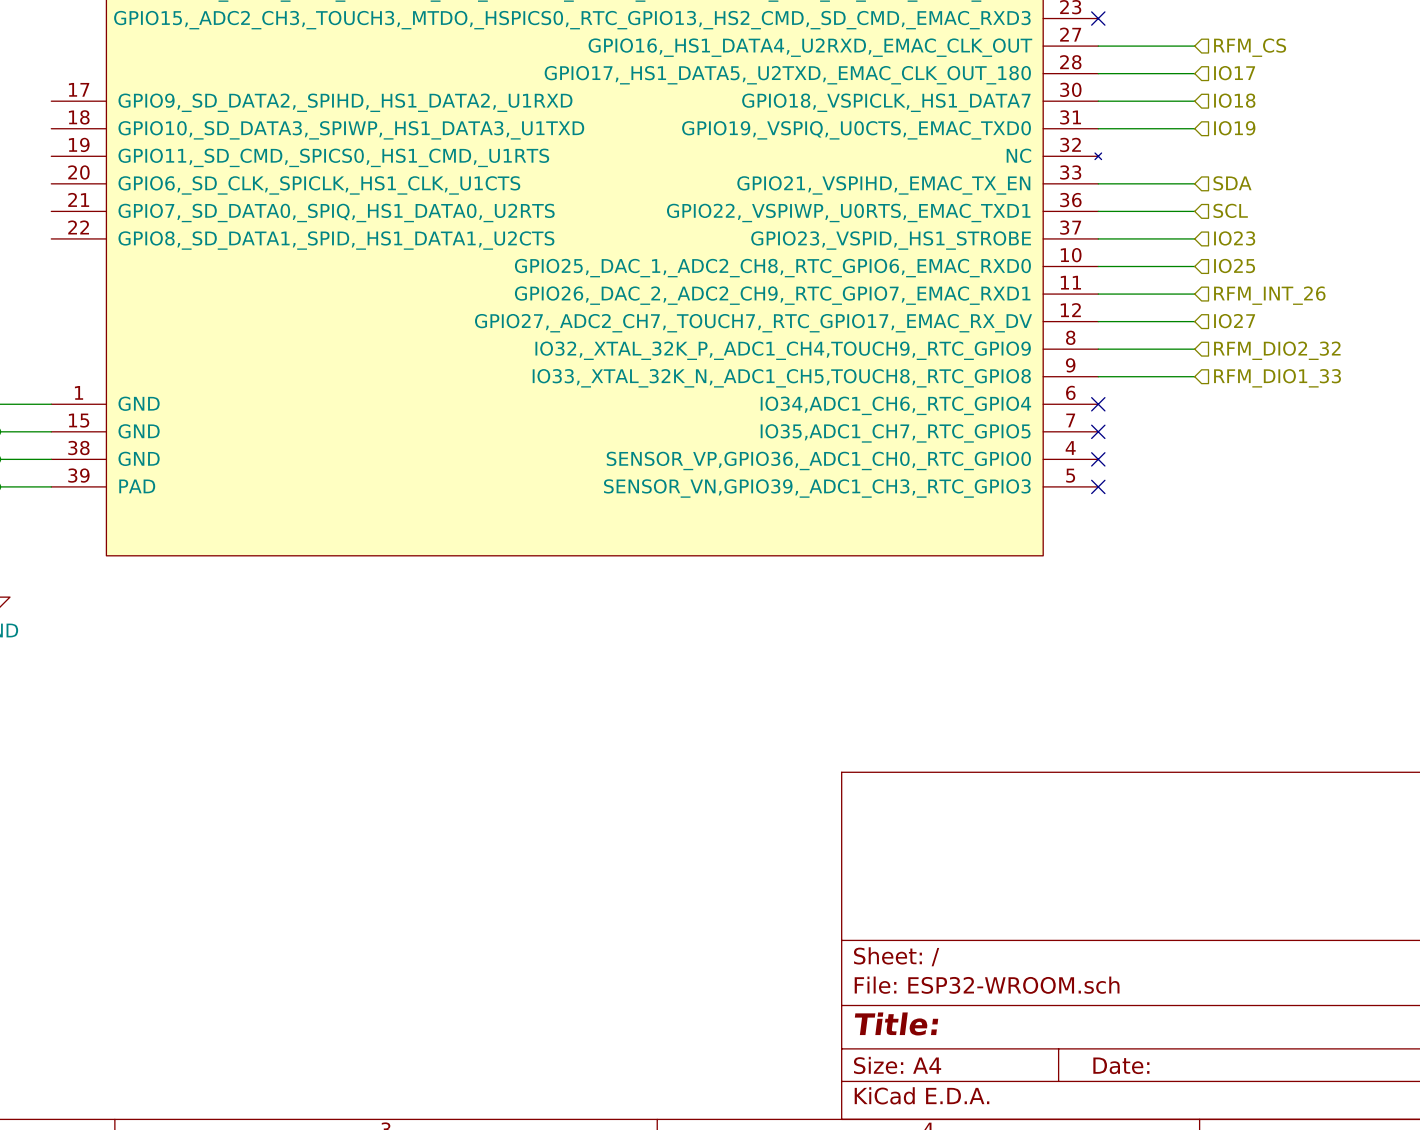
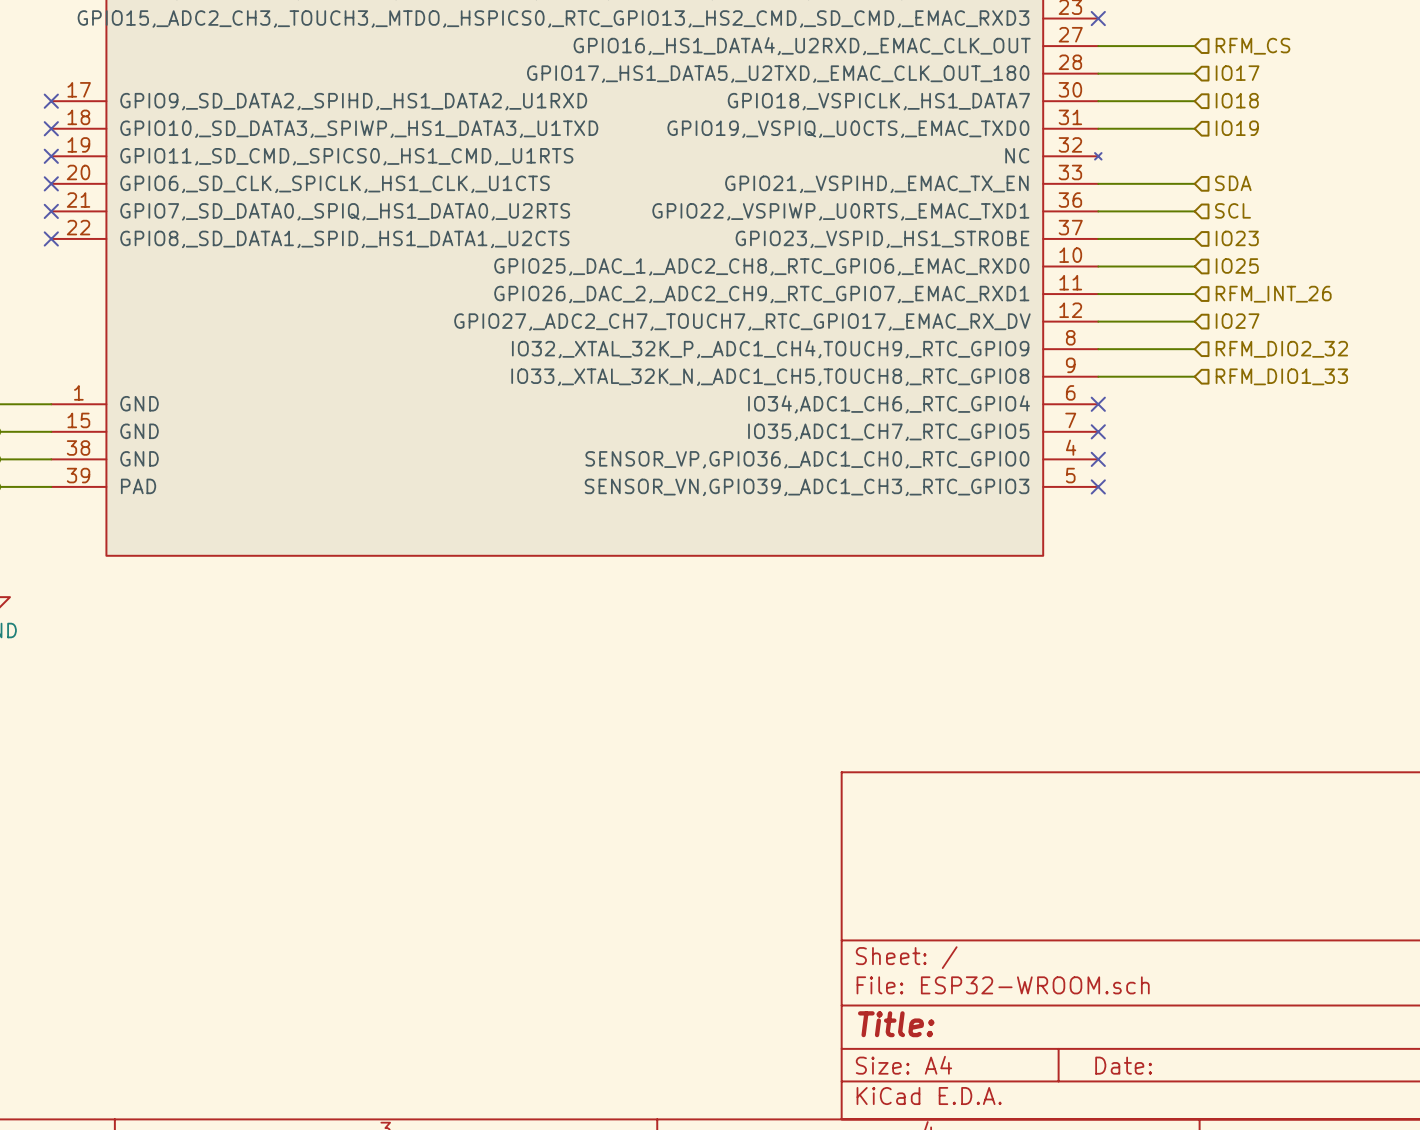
no-connect mark: none -> (51, 101)
no-connect mark: none -> (51, 128)
no-connect mark: none -> (51, 156)
no-connect mark: none -> (51, 183)
no-connect mark: none -> (51, 211)
no-connect mark: none -> (51, 238)

